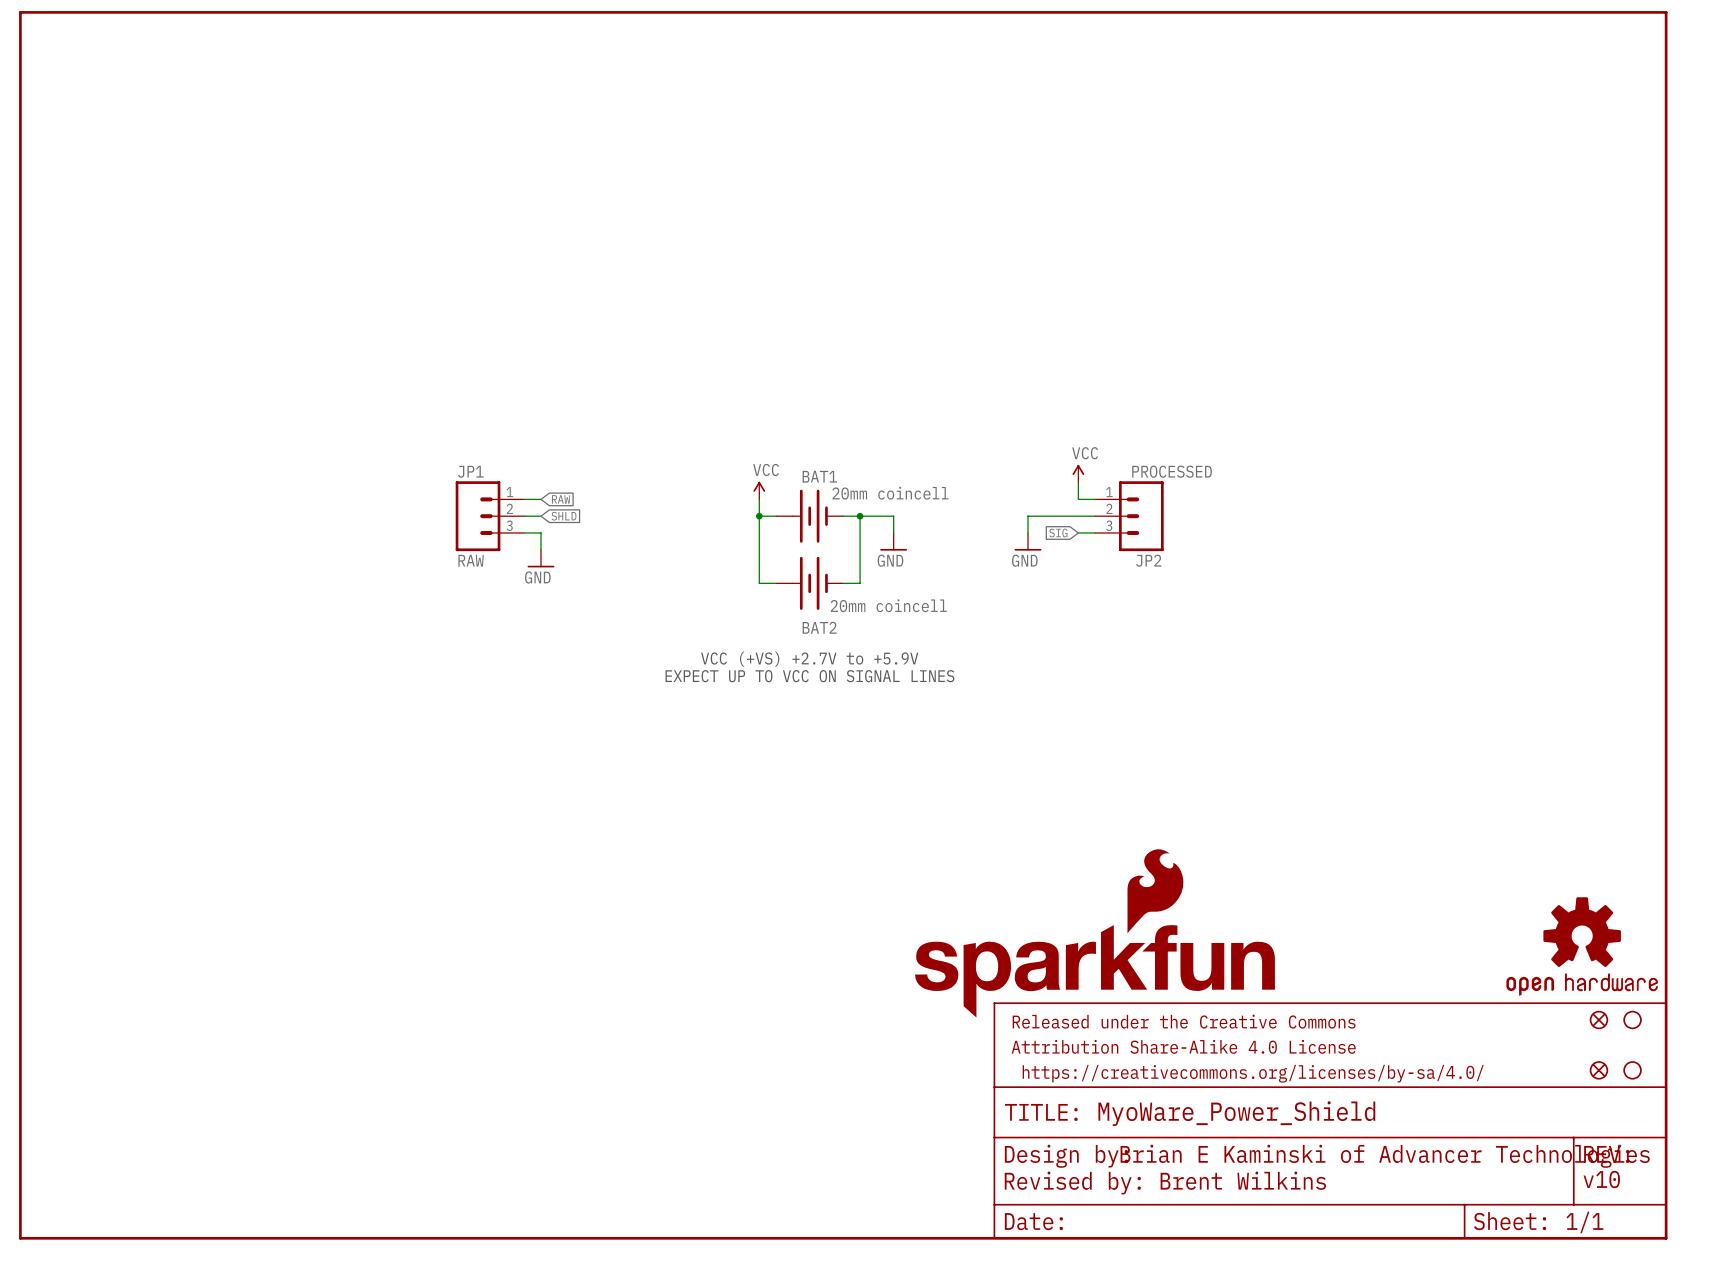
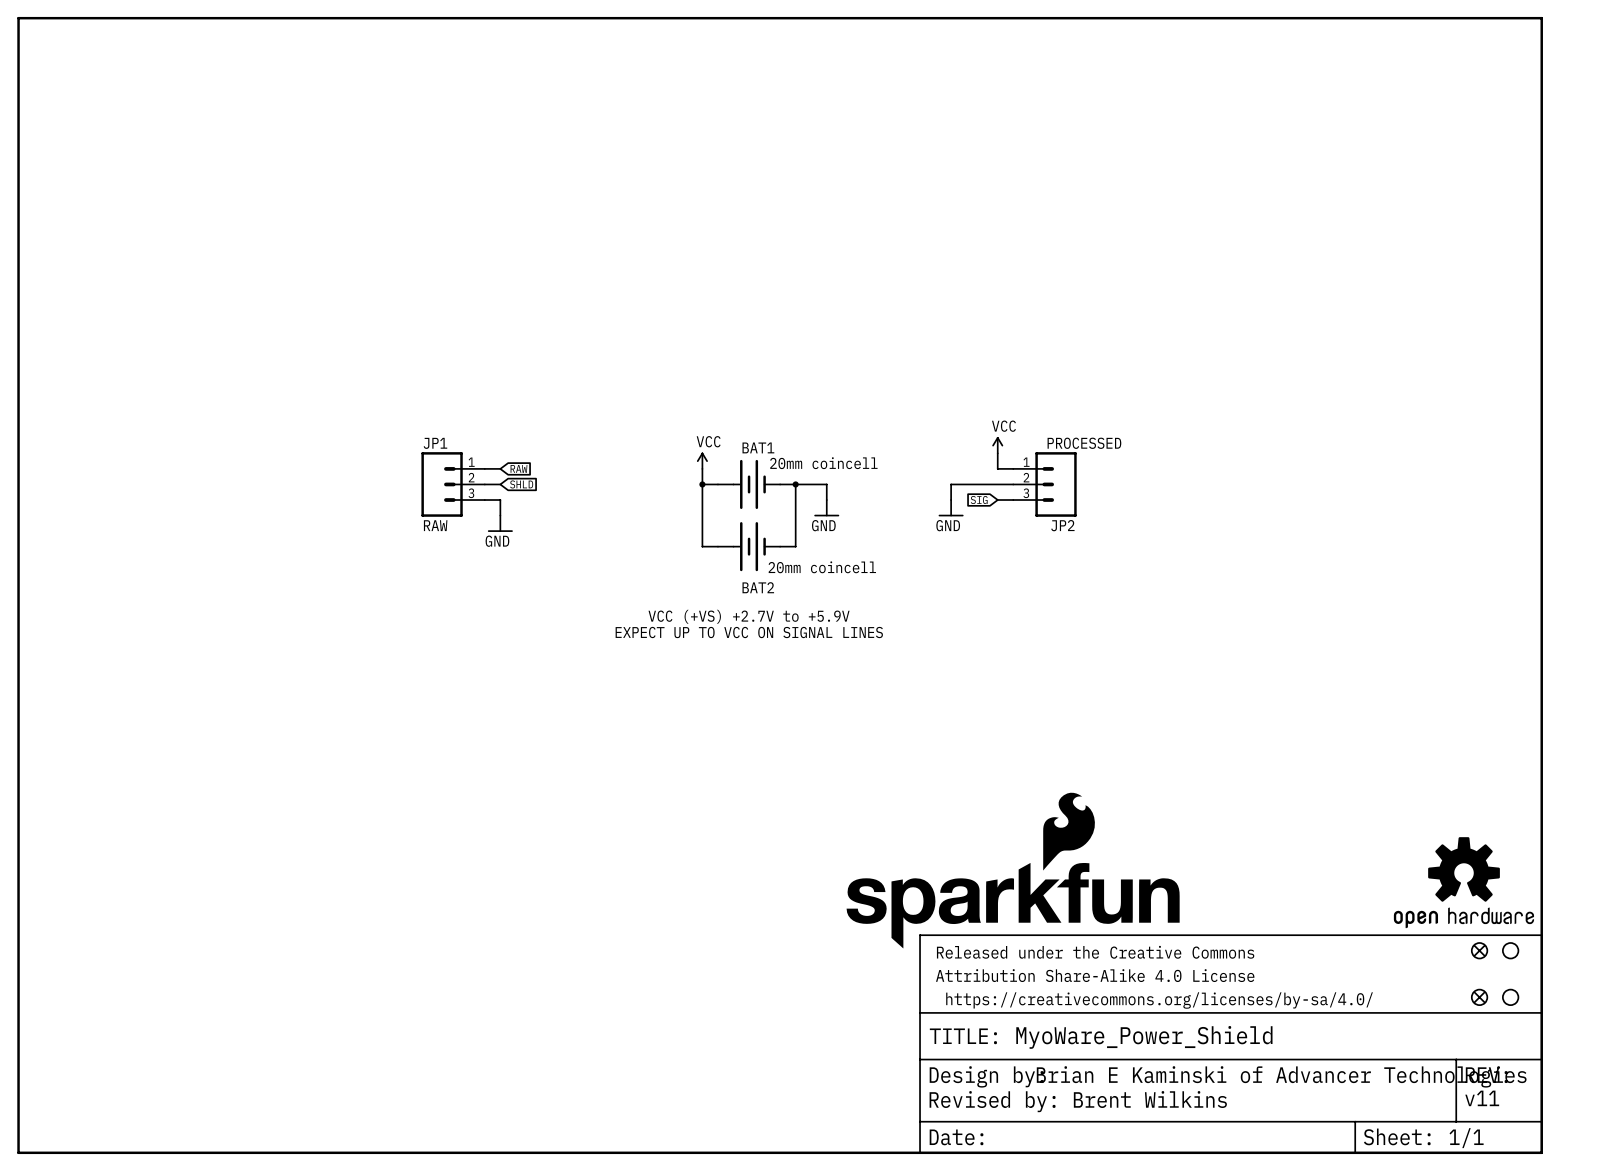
text: v10 (1601, 1179) -> v11 (1482, 1098)

